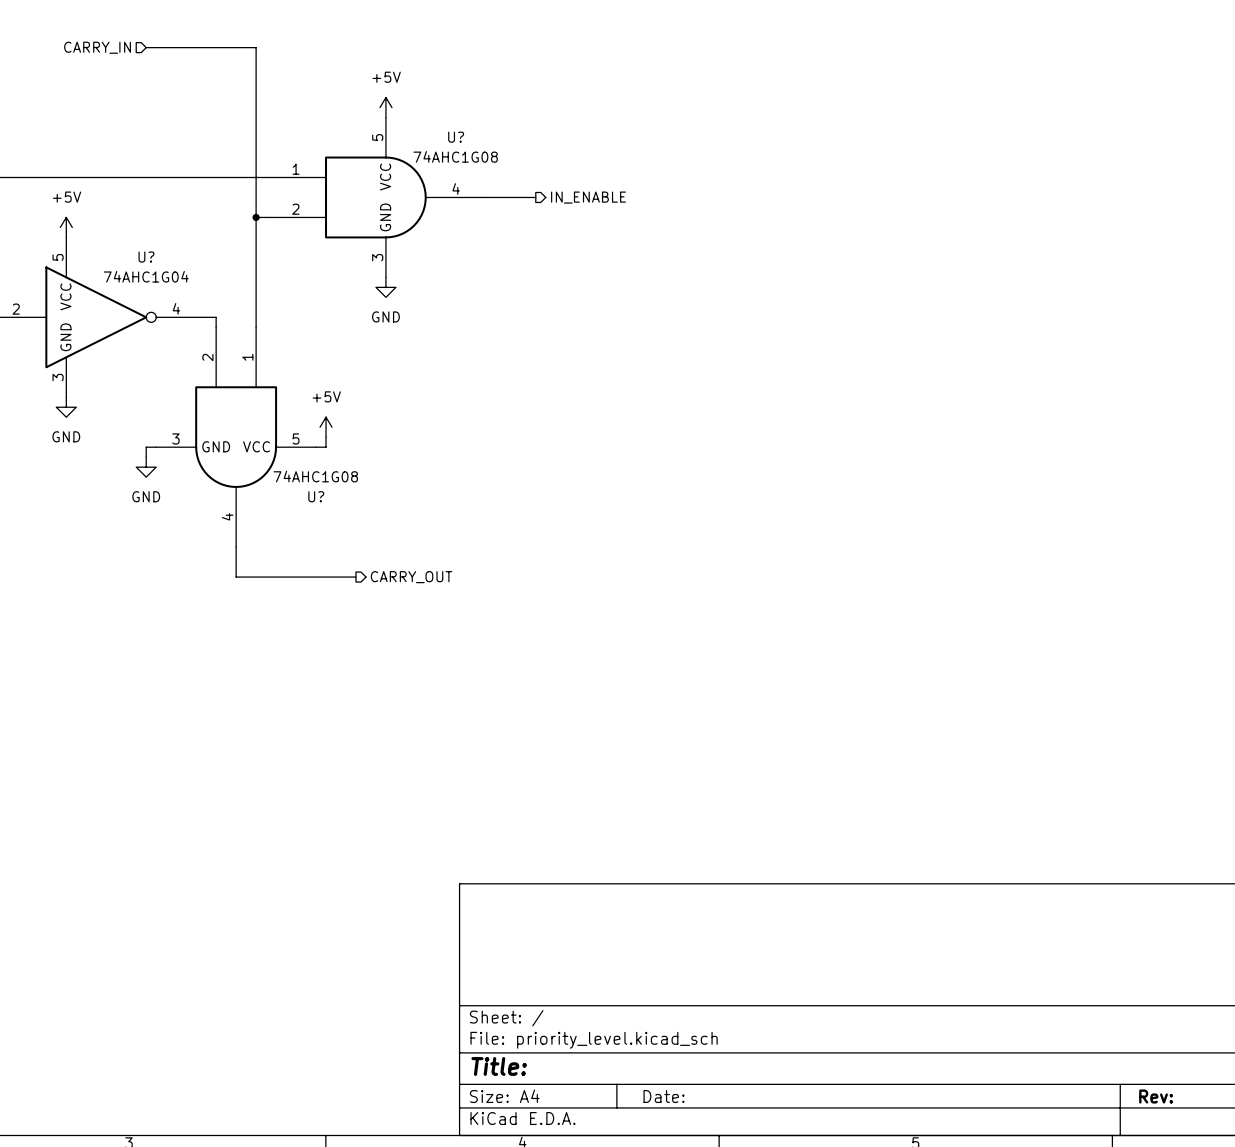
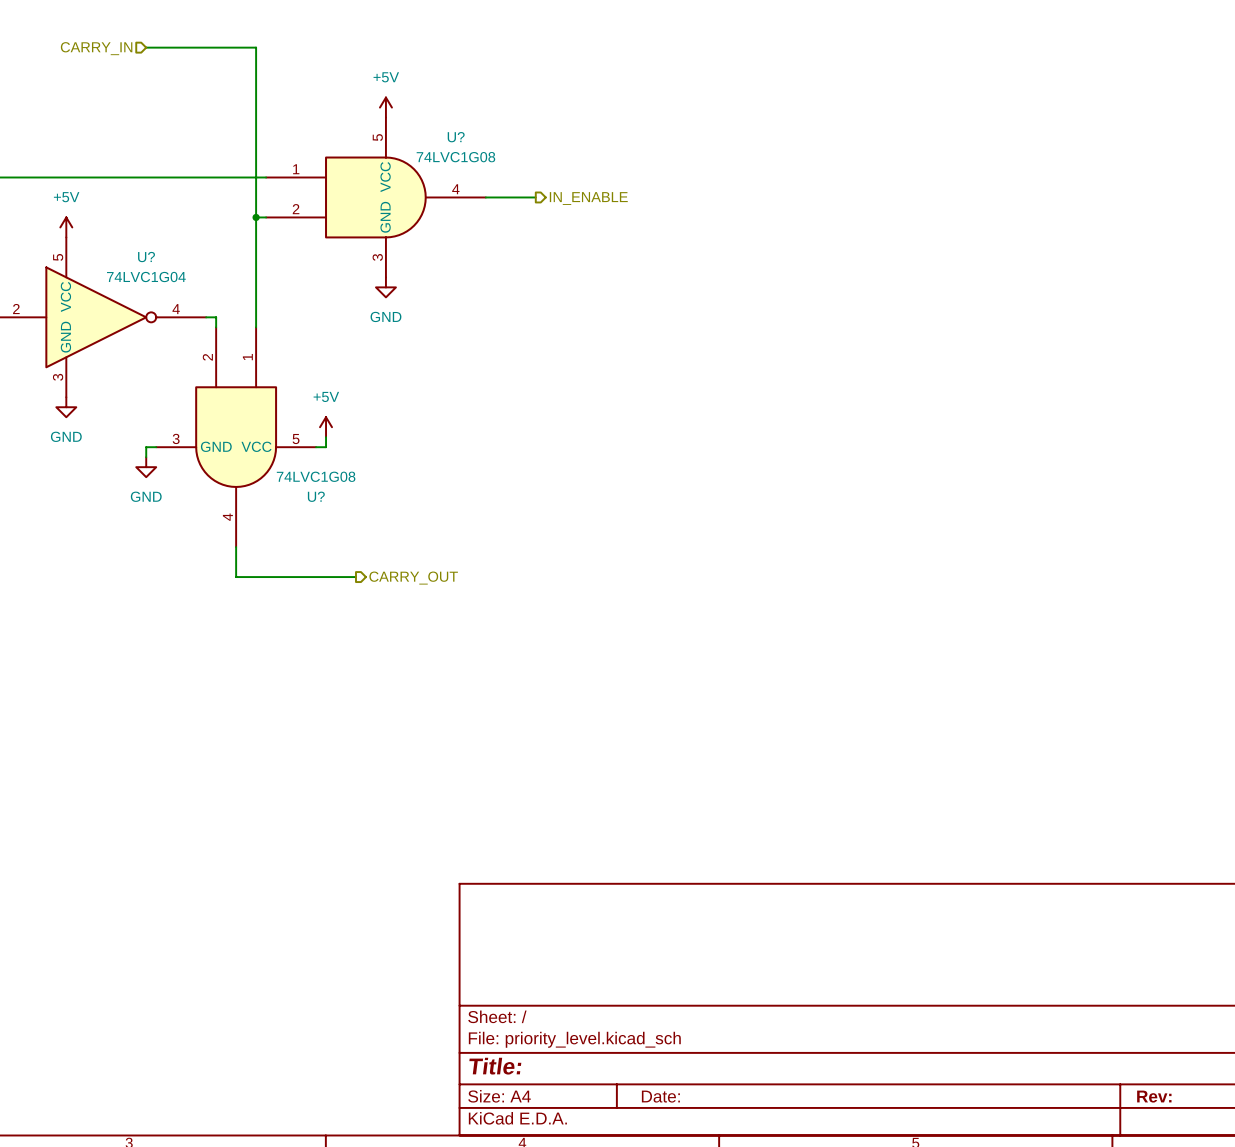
U? value: 74AHC1G08 (455, 156) -> 74LVC1G08 (455, 157)
U? value: 74AHC1G04 (146, 276) -> 74LVC1G04 (146, 277)
U? value: 74AHC1G08 (315, 476) -> 74LVC1G08 (316, 476)

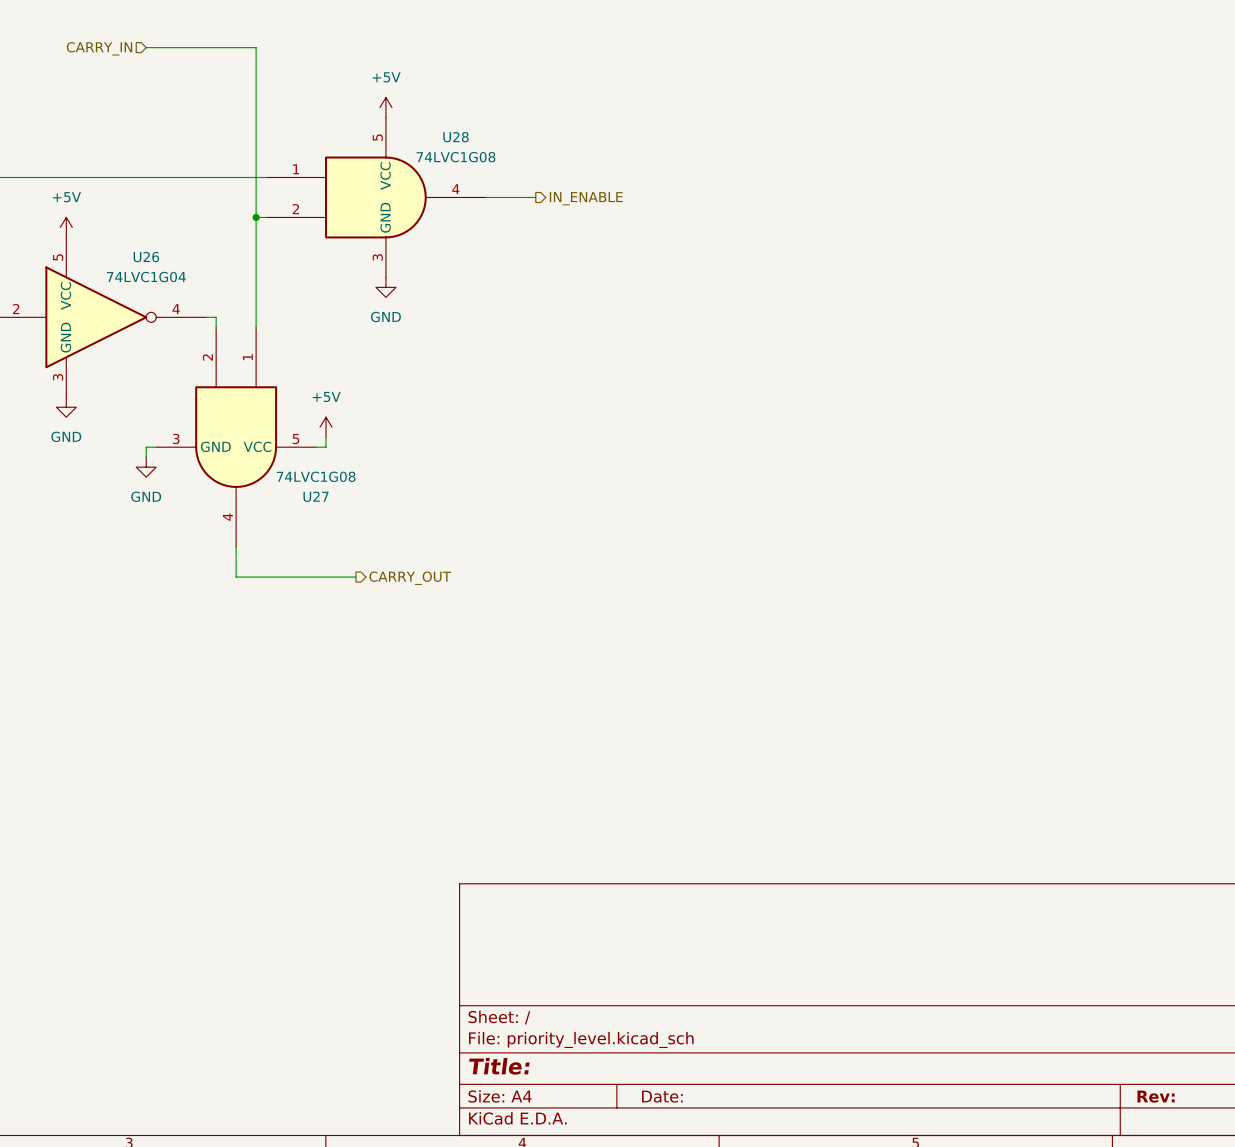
U? name: U? (456, 137) -> U28 (456, 137)
U? name: U? (146, 257) -> U26 (146, 257)
U? name: U? (316, 496) -> U27 (316, 496)

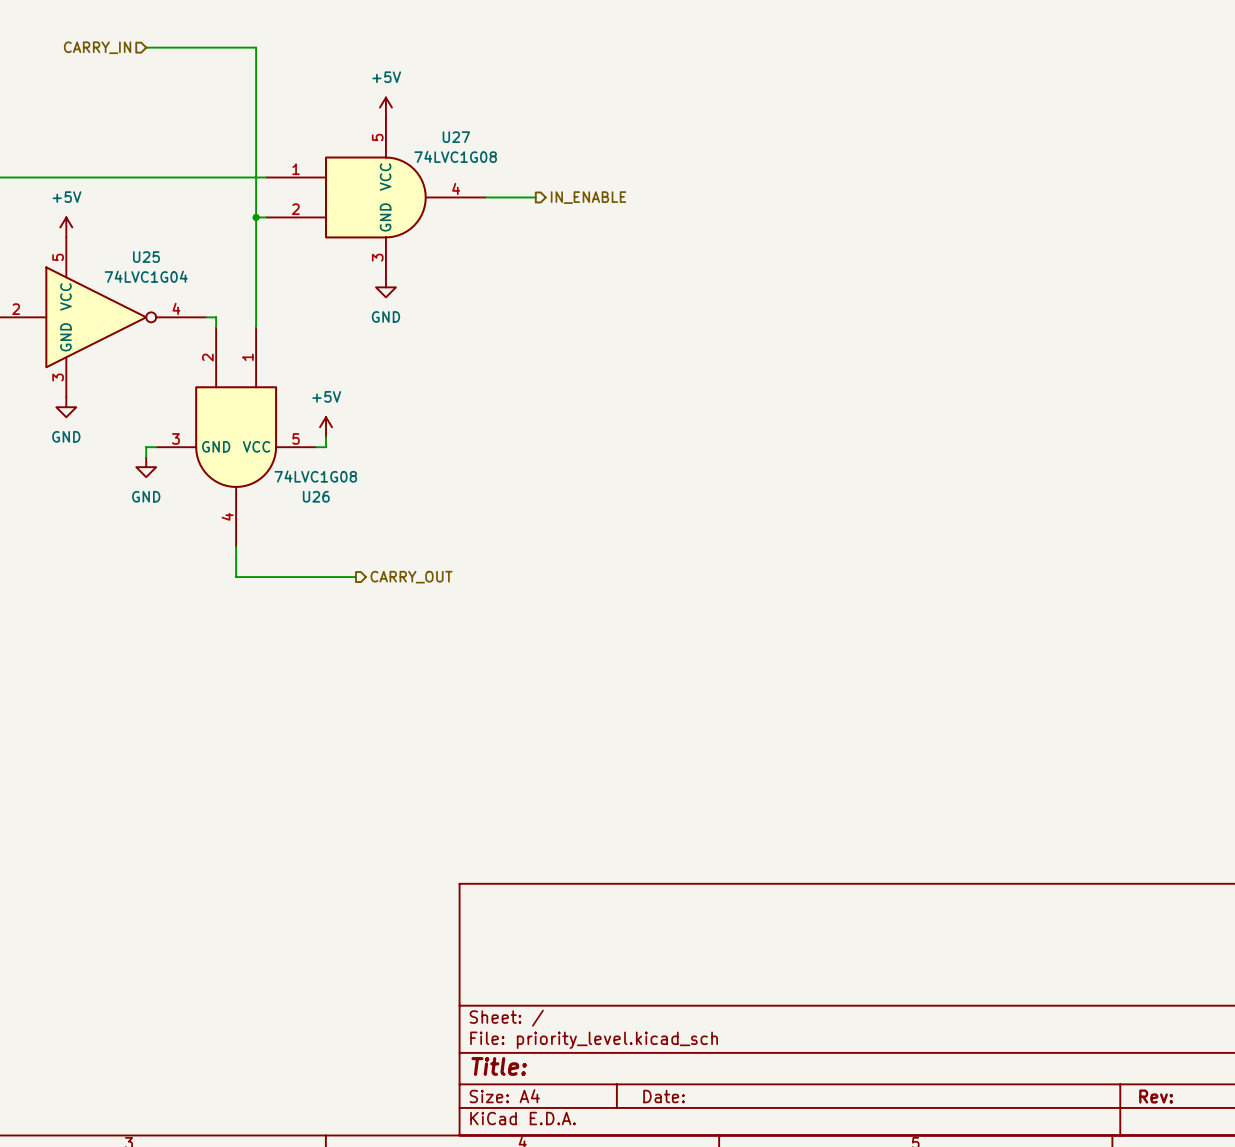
U28 name: U28 (456, 137) -> U27 (456, 137)
U26 name: U26 (146, 257) -> U25 (146, 257)
U27 name: U27 (316, 496) -> U26 (316, 496)

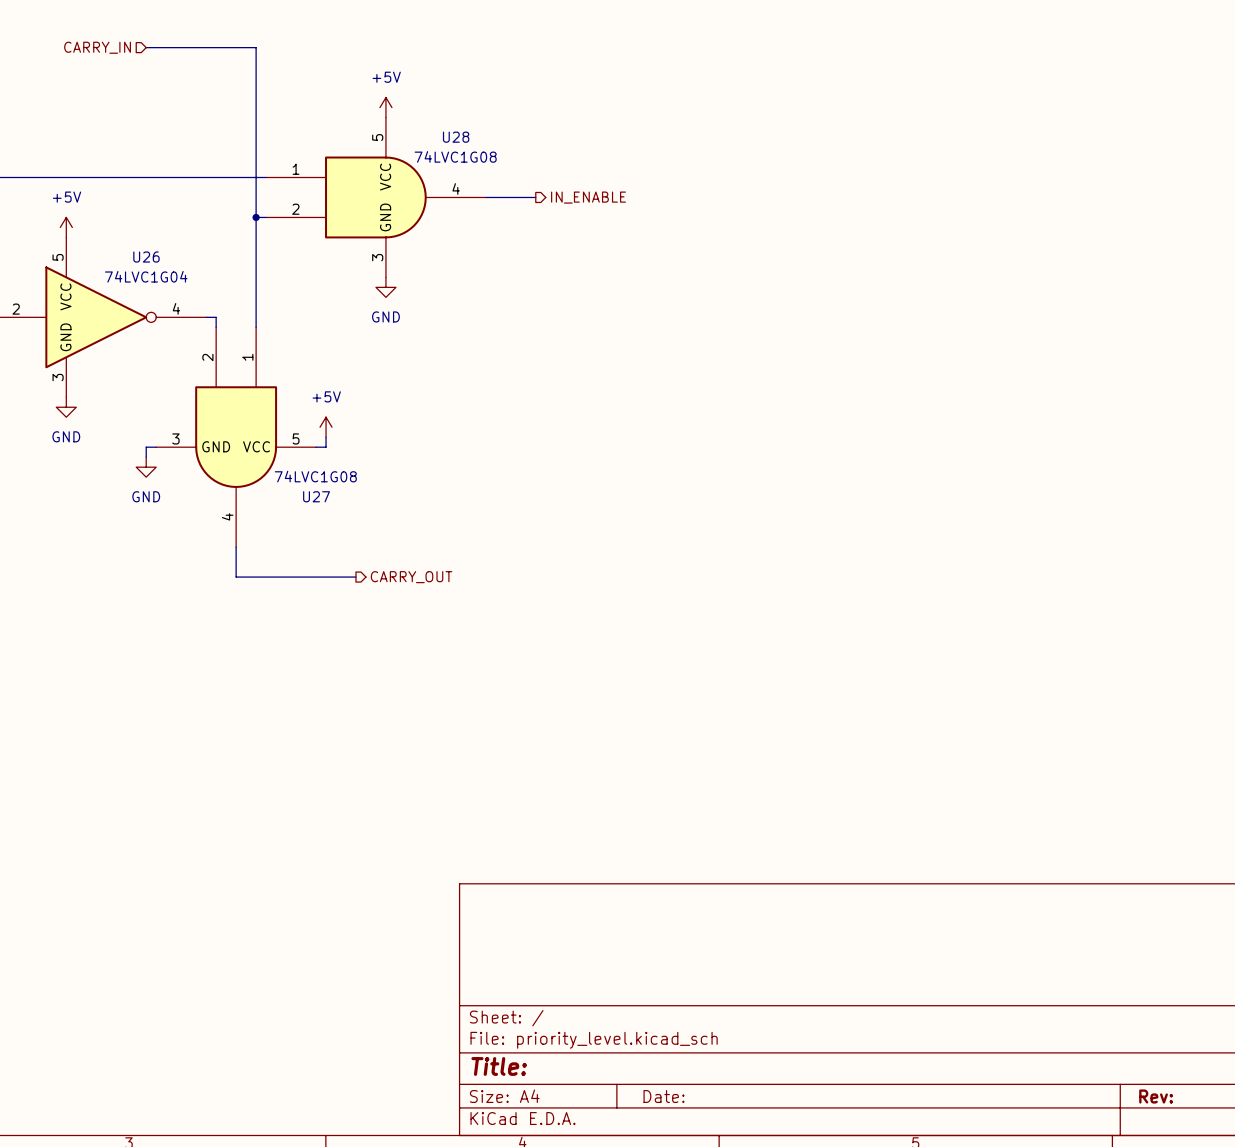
U27 name: U27 (456, 137) -> U28 (456, 137)
U25 name: U25 (146, 257) -> U26 (146, 257)
U26 name: U26 (316, 496) -> U27 (316, 496)

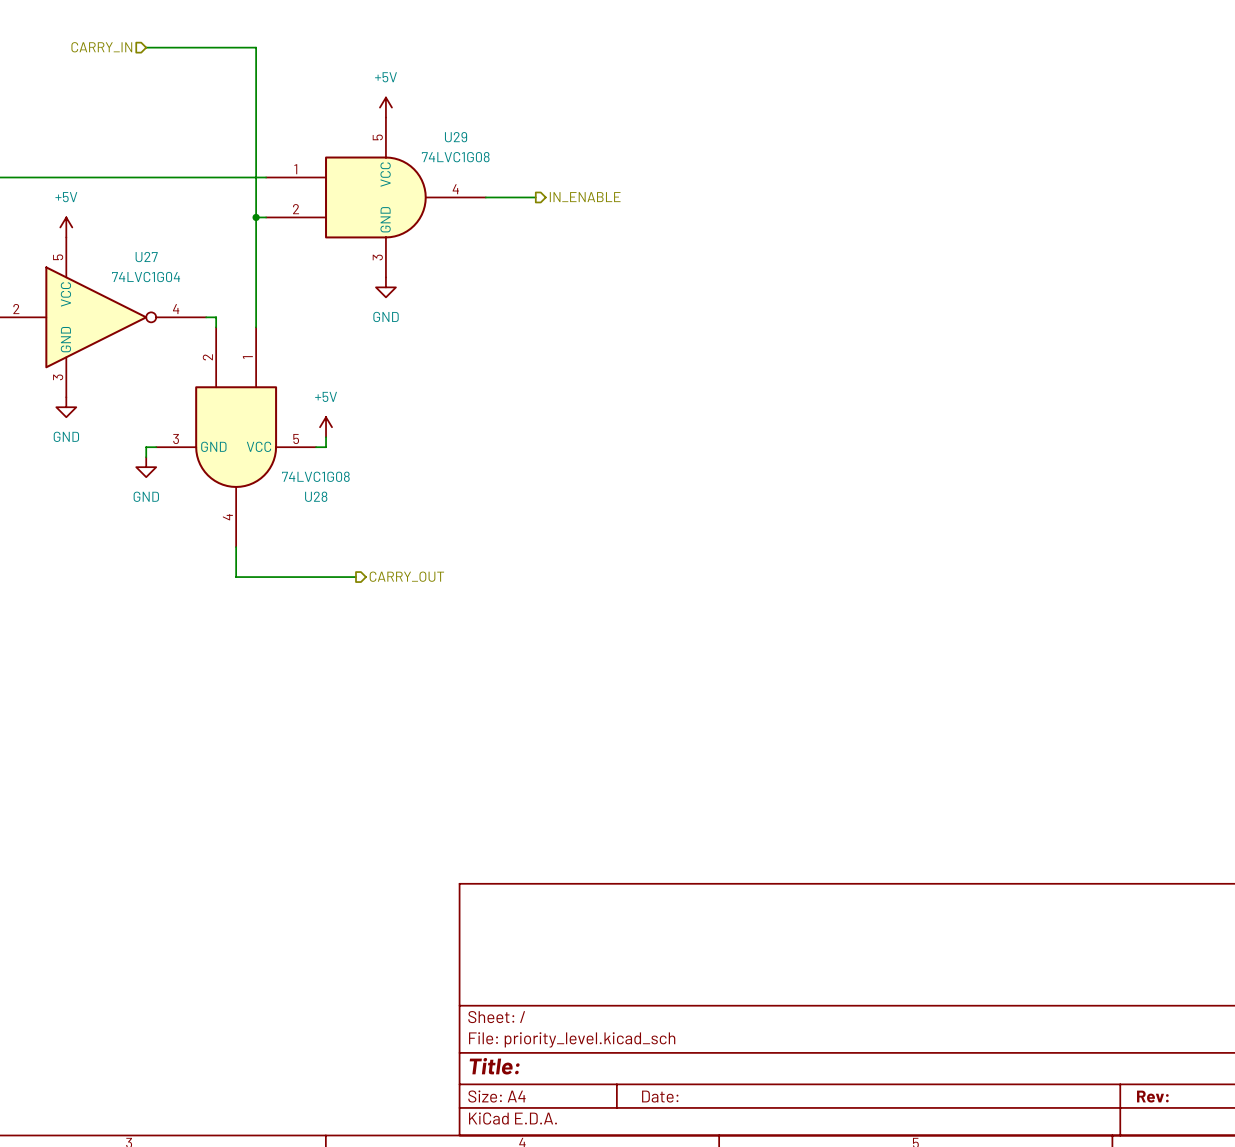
U28 name: U28 (456, 137) -> U29 (456, 137)
U26 name: U26 (146, 257) -> U27 (146, 257)
U27 name: U27 (316, 496) -> U28 (316, 496)

